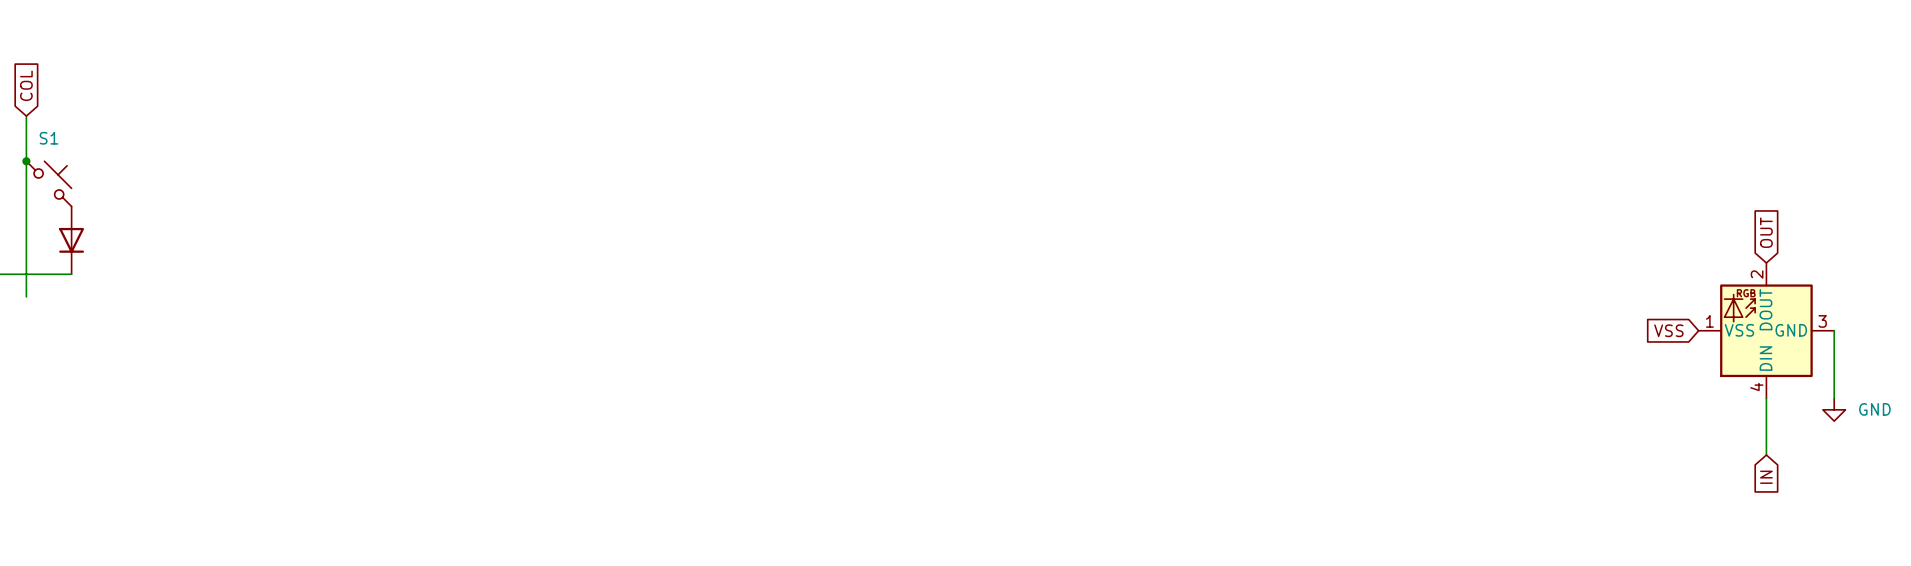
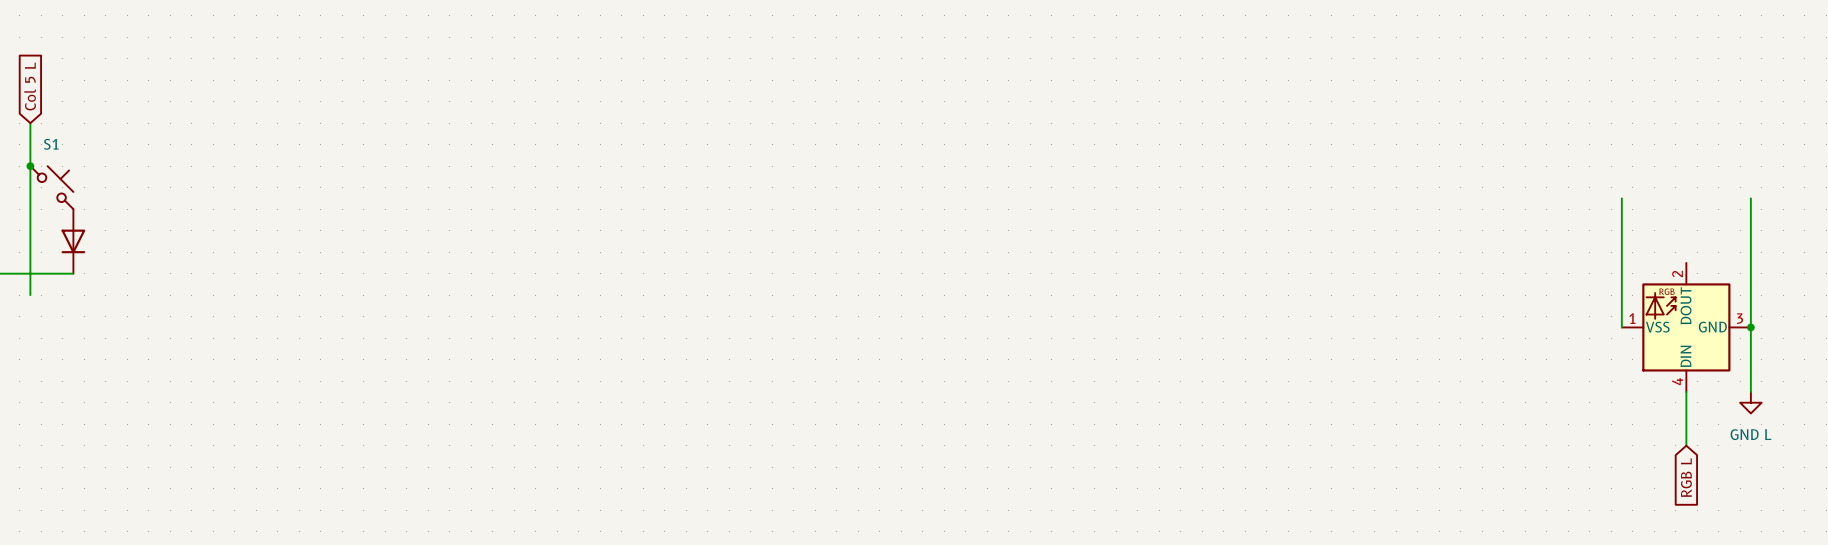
global label: COL (26, 85) -> Col 5 L (30, 86)
wire: none -> (1621, 198) (1621, 327)
wire: none -> (1750, 198) (1750, 327)
global label: OUT (1766, 232) -> none
global label: VSS (1668, 330) -> none
junction: none -> (1750, 327)
power symbol: GND (1834, 409) -> GND L (1750, 402)
global label: IN (1766, 477) -> RGB L (1686, 477)

